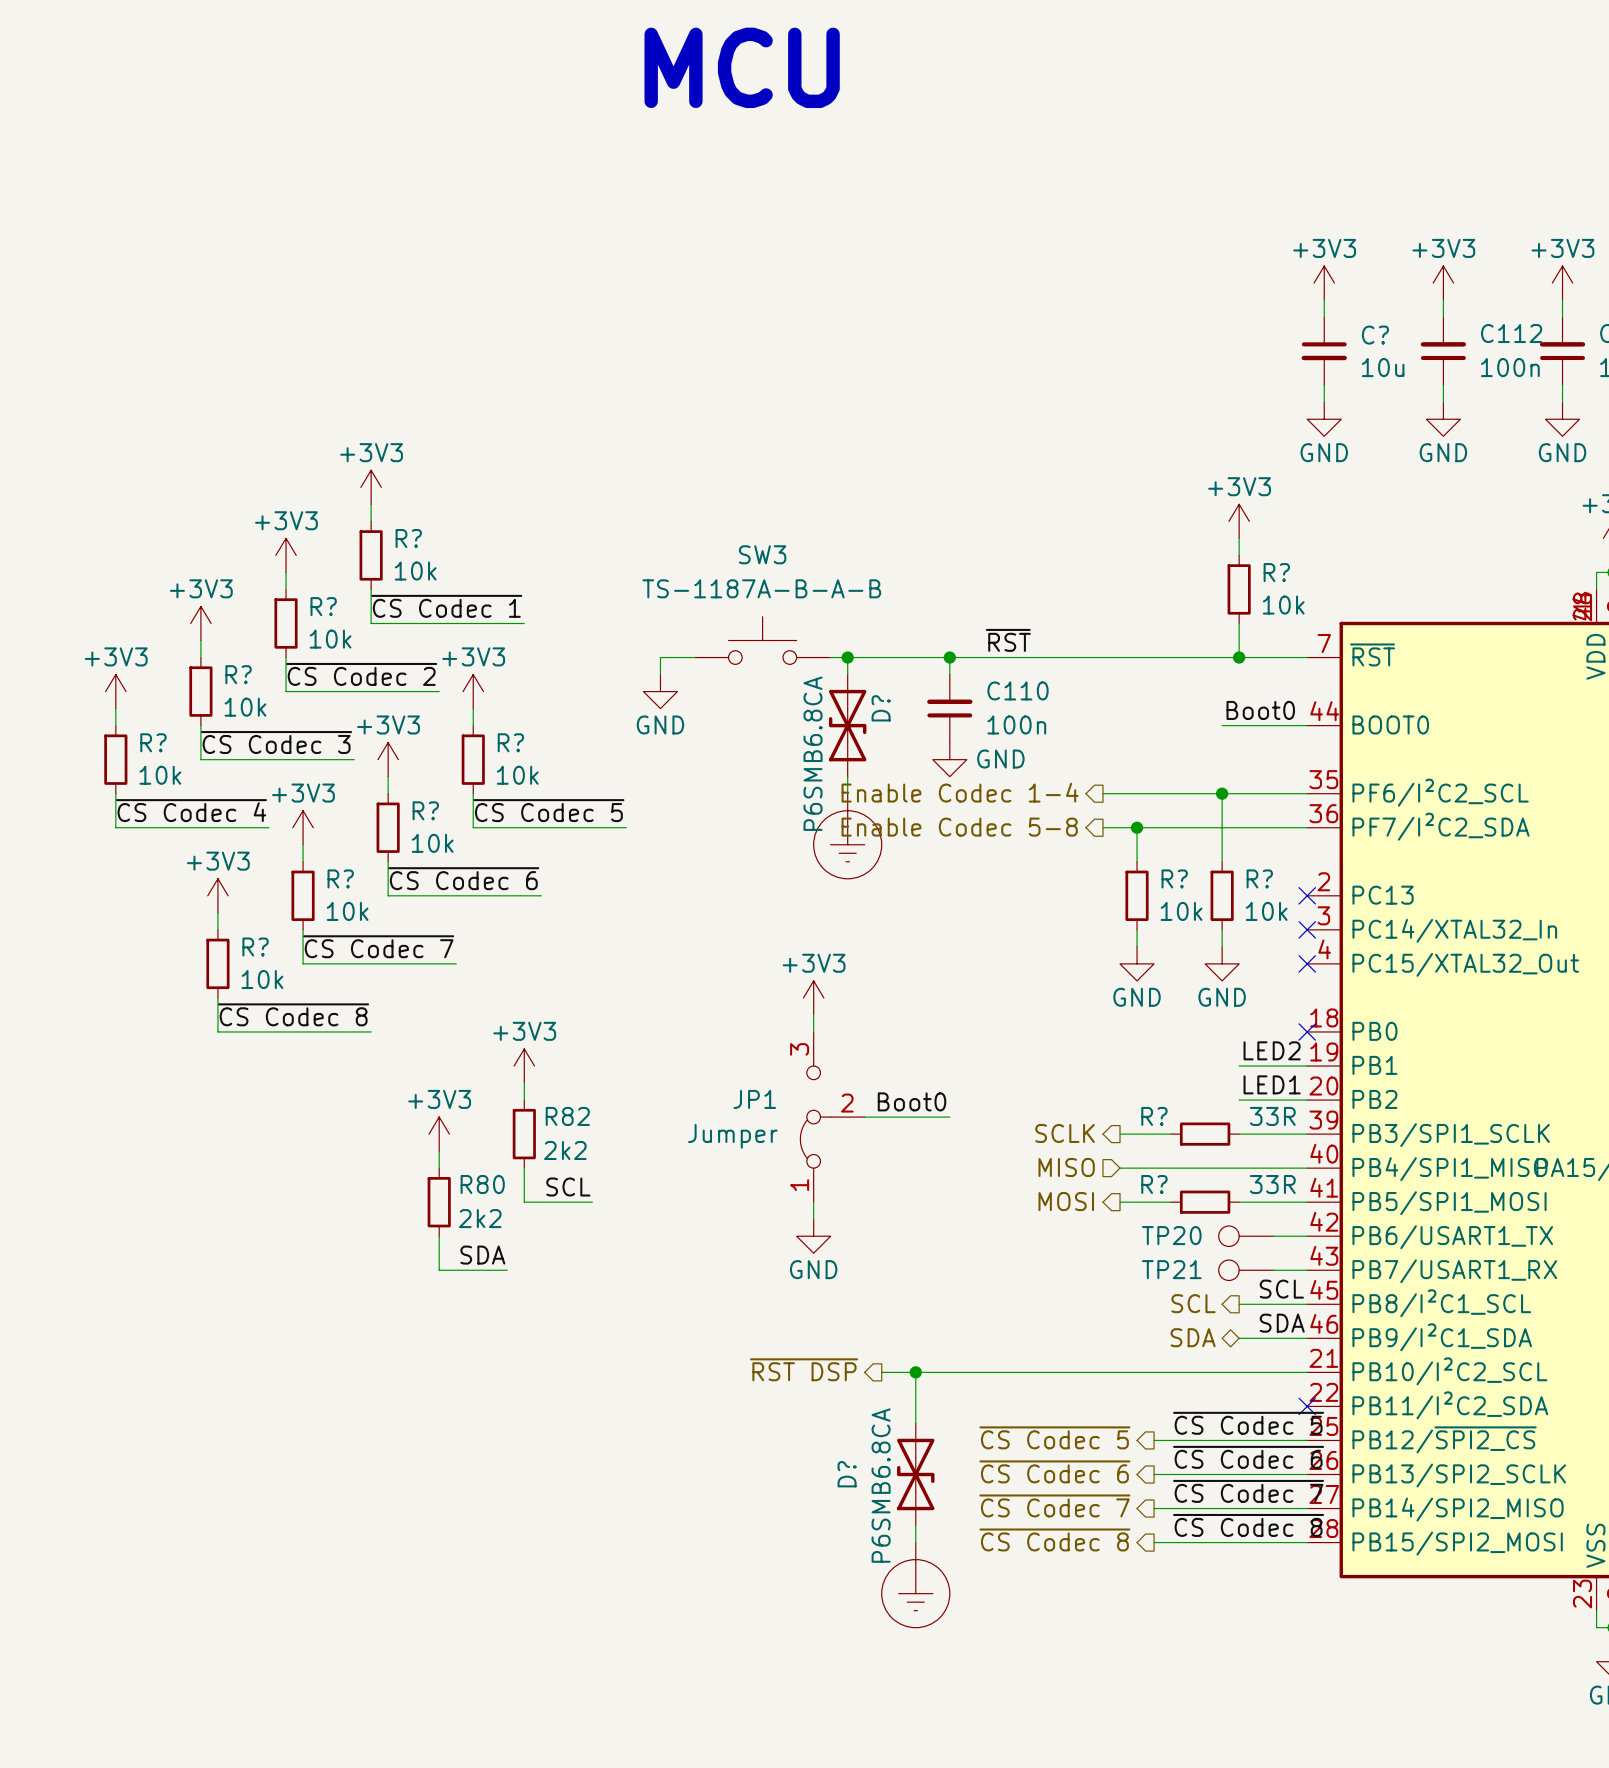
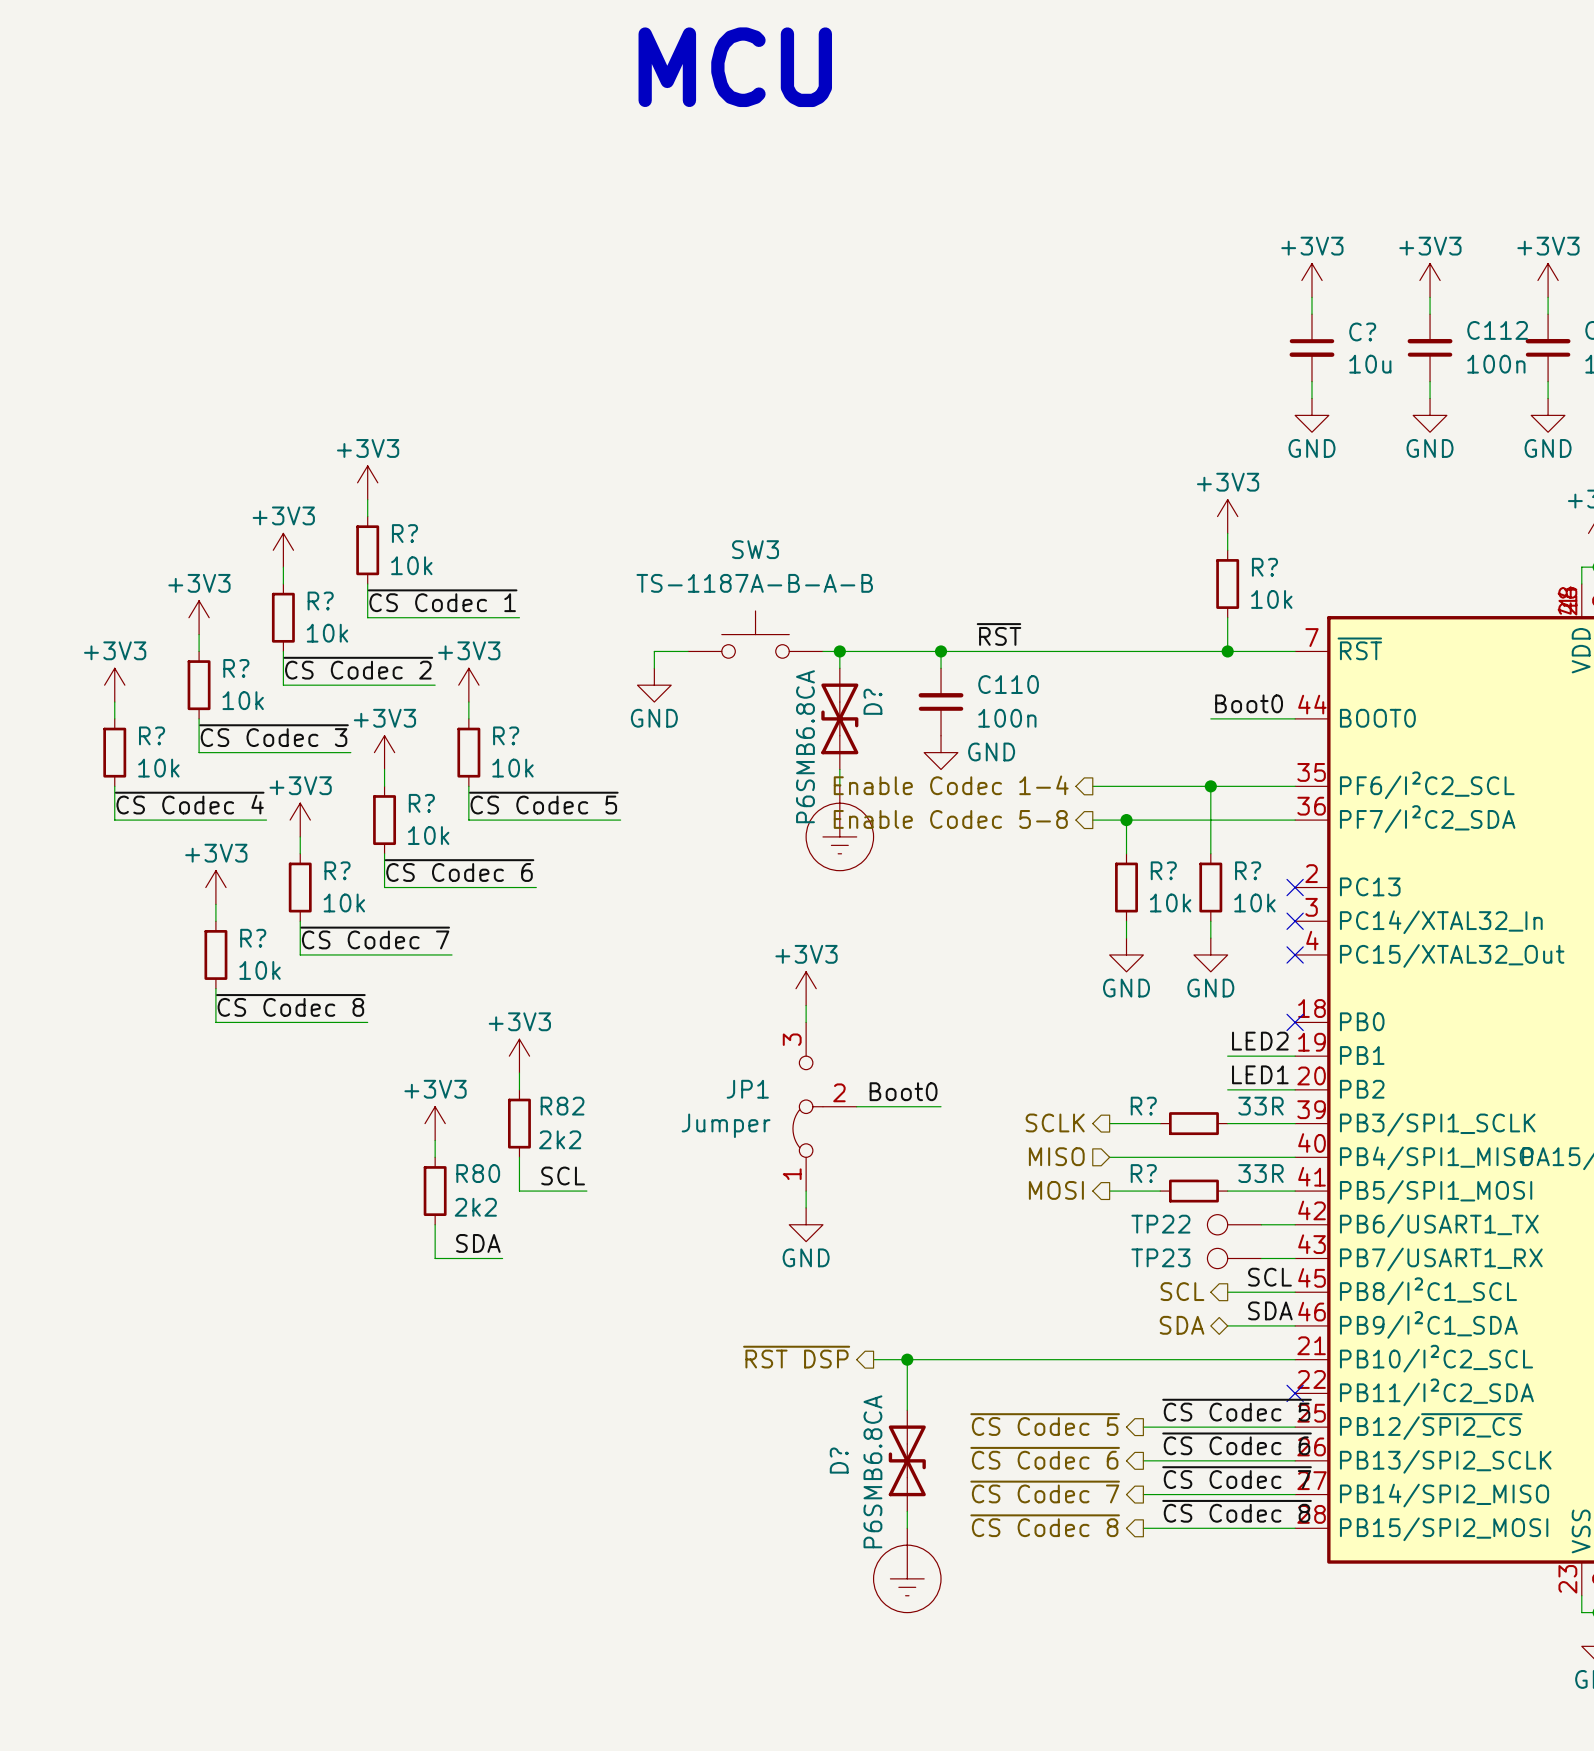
TP20 name: TP20 (1171, 1235) -> TP22 (1160, 1224)
TP21 name: TP21 (1171, 1269) -> TP23 (1160, 1257)

